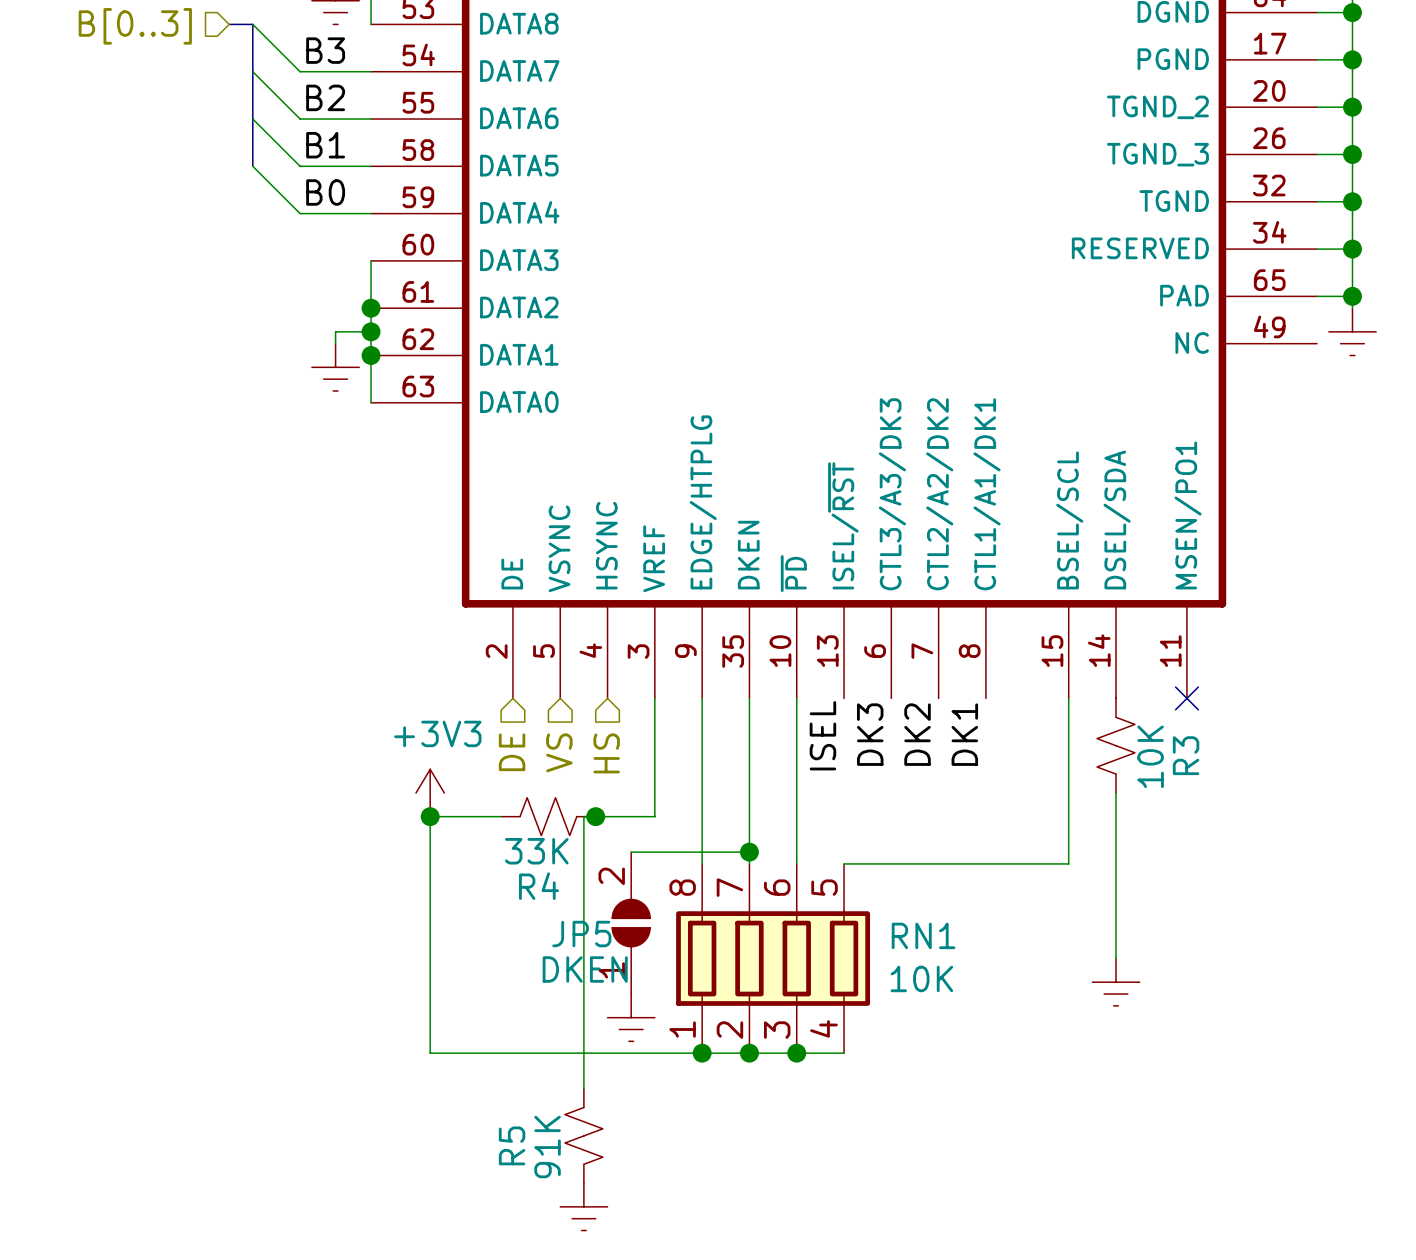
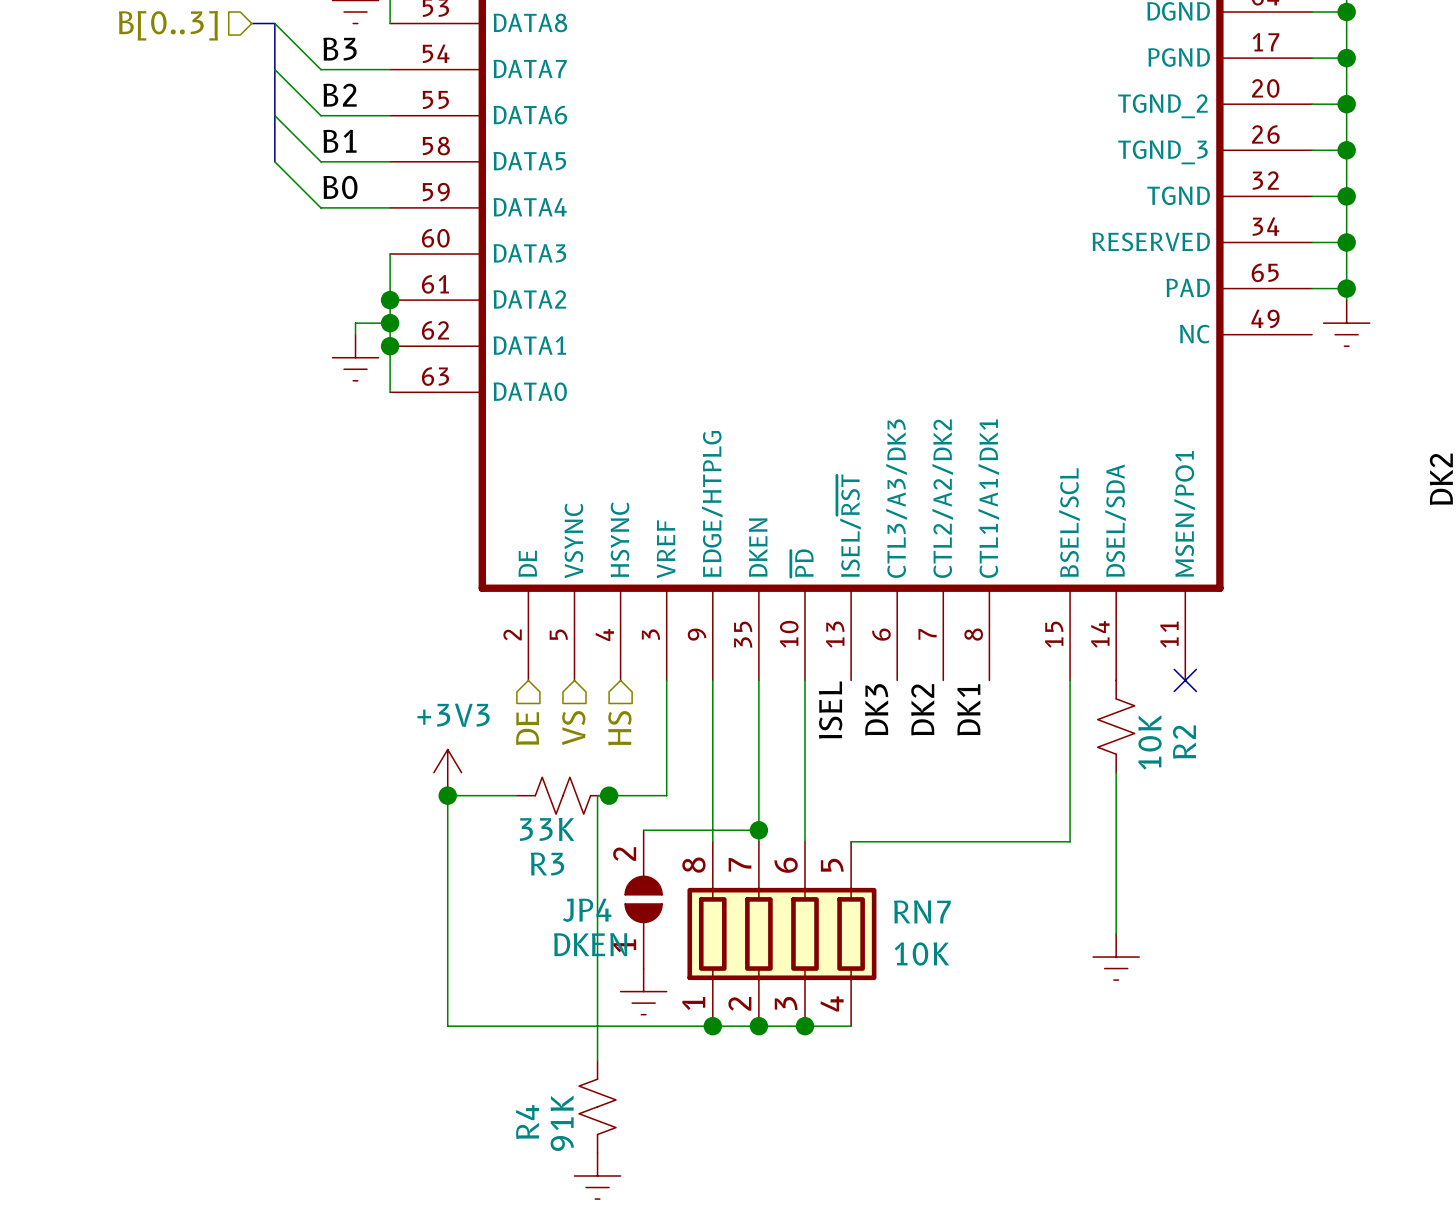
R3 name: R3 (1186, 755) -> R2 (1184, 742)
R4 name: R4 (539, 886) -> R3 (547, 864)
JP5 name: JP5 (581, 934) -> JP4 (587, 910)
RN1 name: RN1 (923, 935) -> RN7 (922, 911)
R5 name: R5 (512, 1145) -> R4 (527, 1122)

